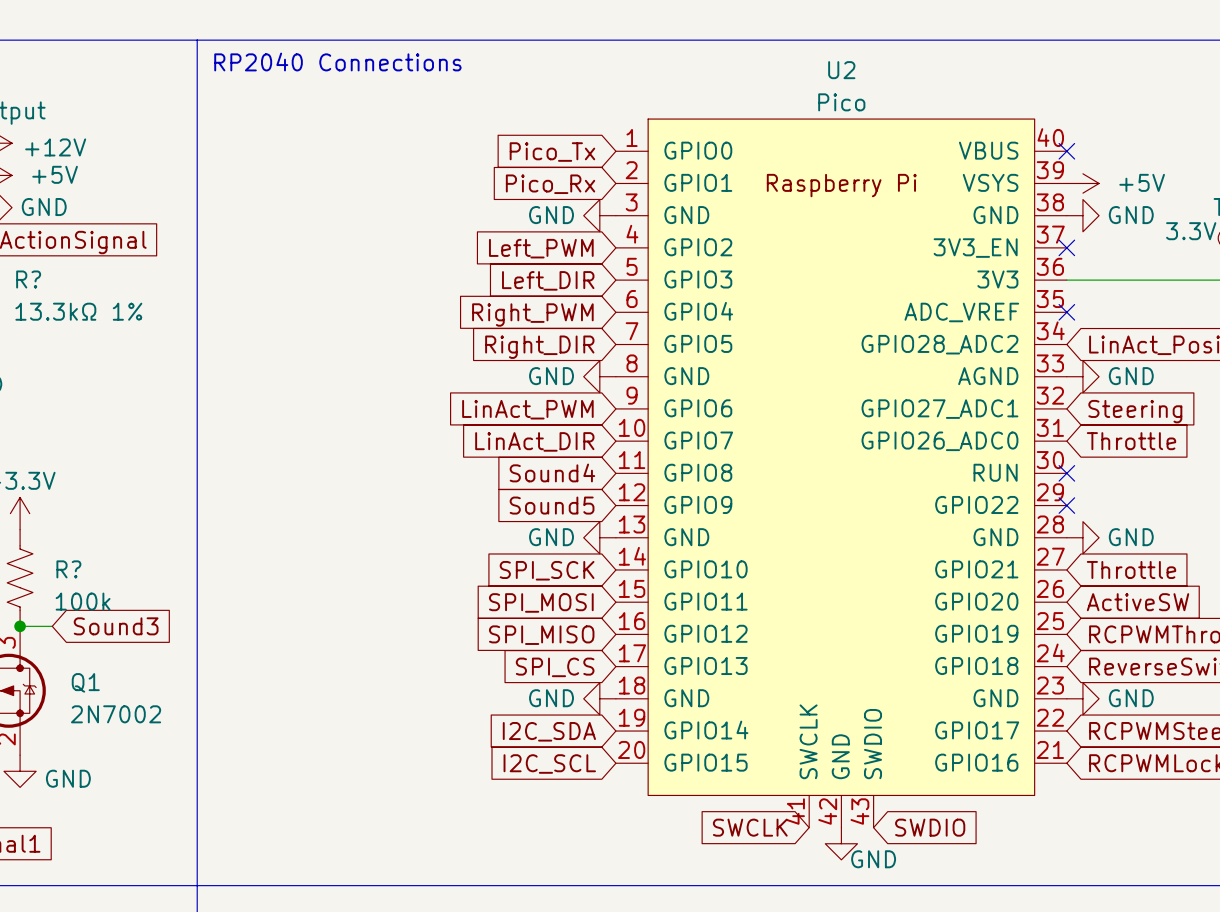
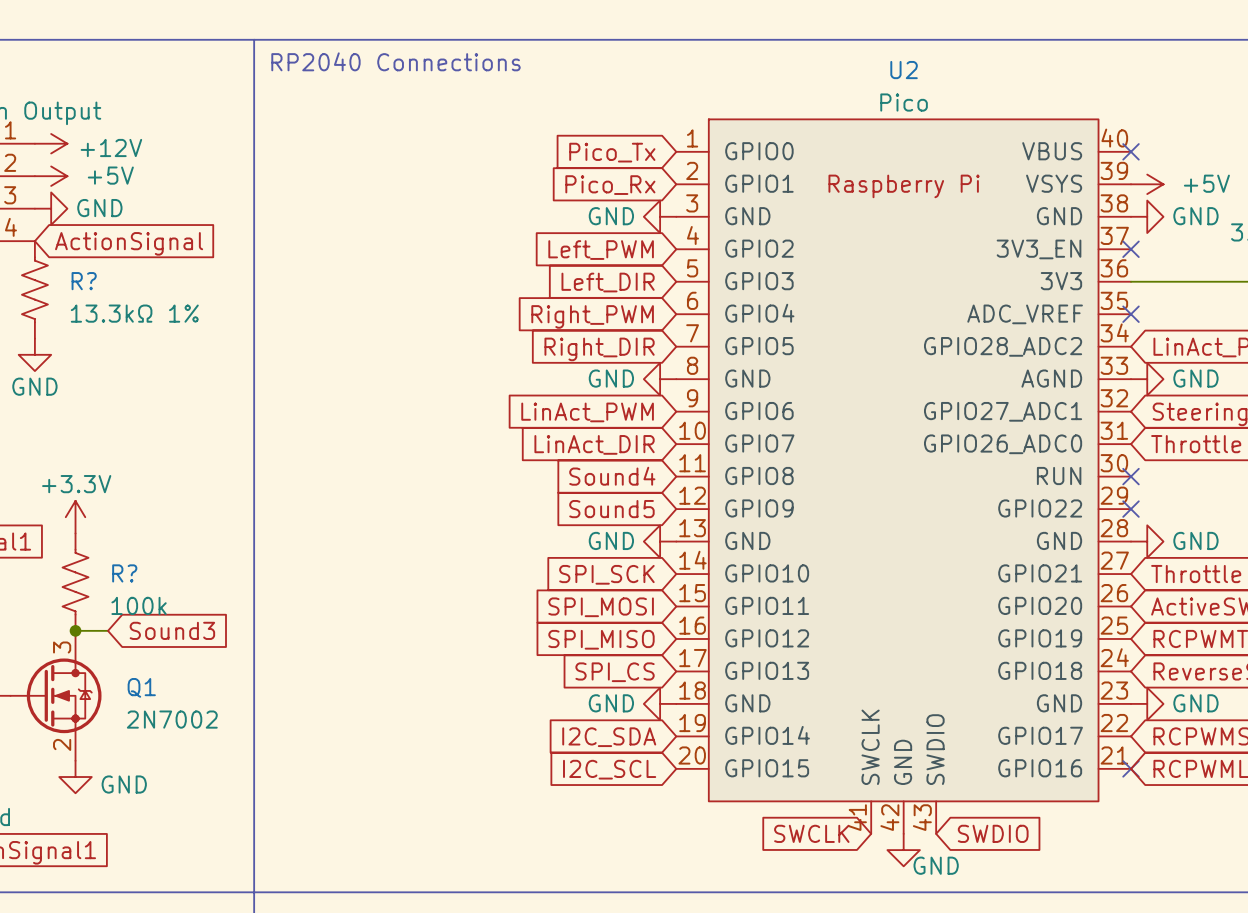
no-connect mark: none -> (1131, 768)

